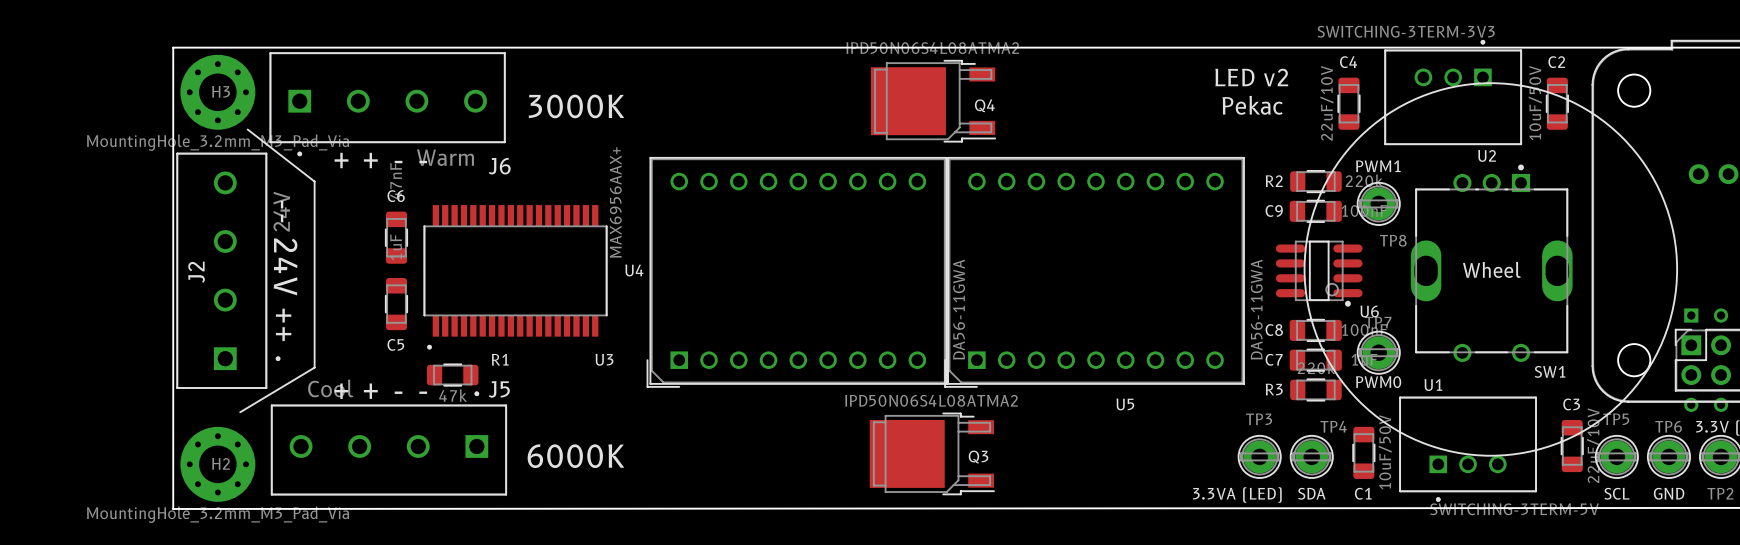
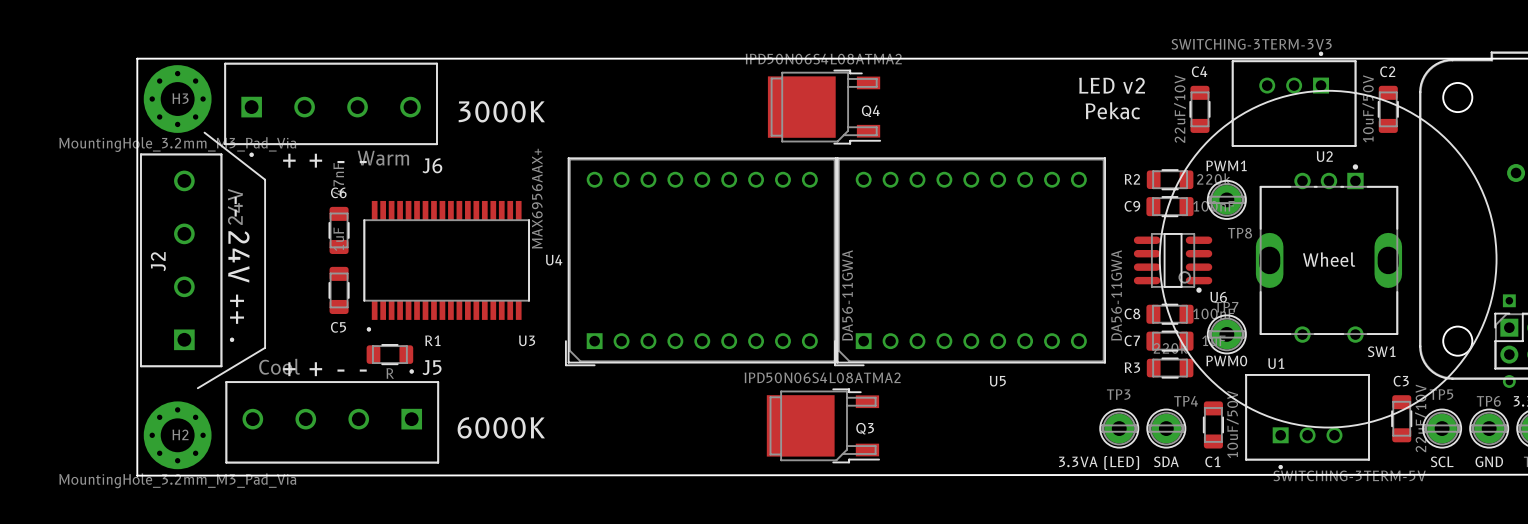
R1 value: 47k (453, 395) -> R (390, 373)

